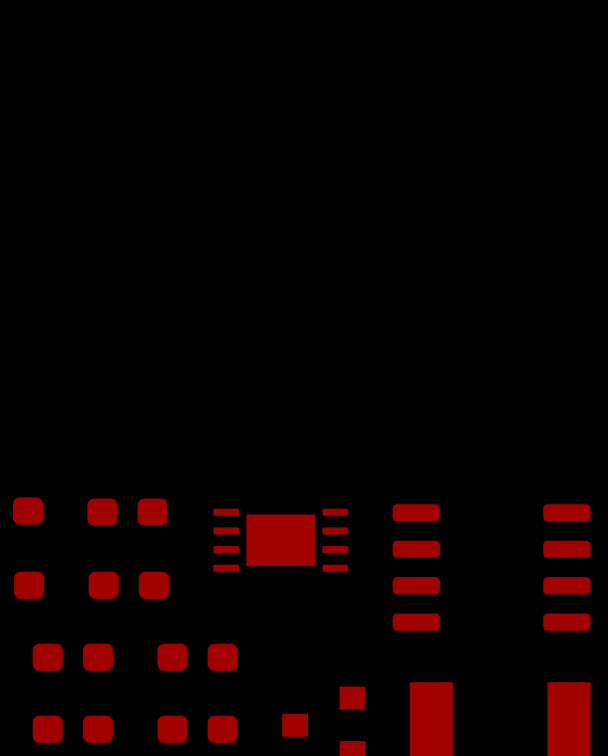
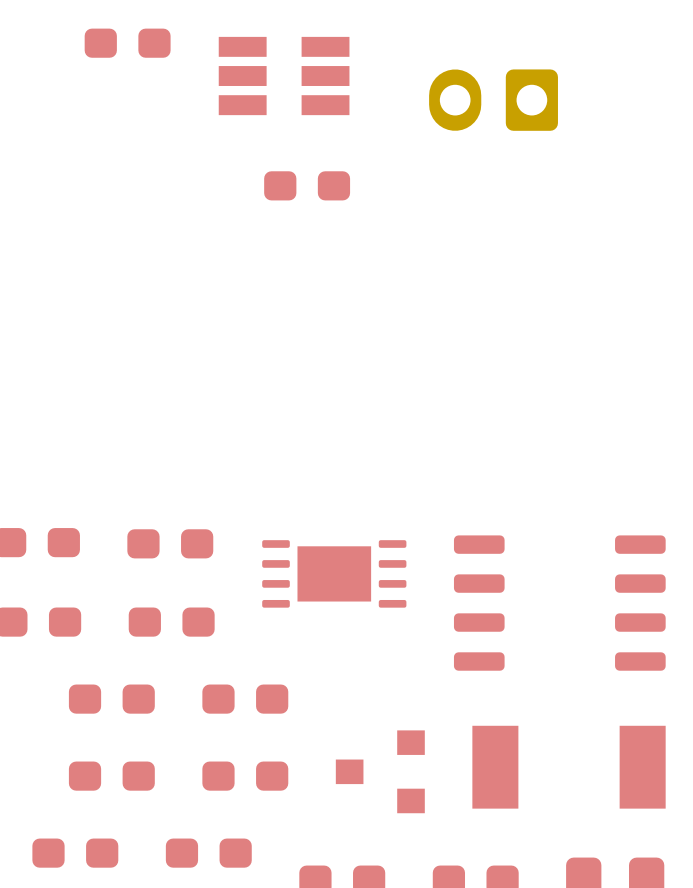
part: none -> (127, 43)
part: none -> (284, 76)
part: none -> (493, 100)
part: none -> (307, 185)

